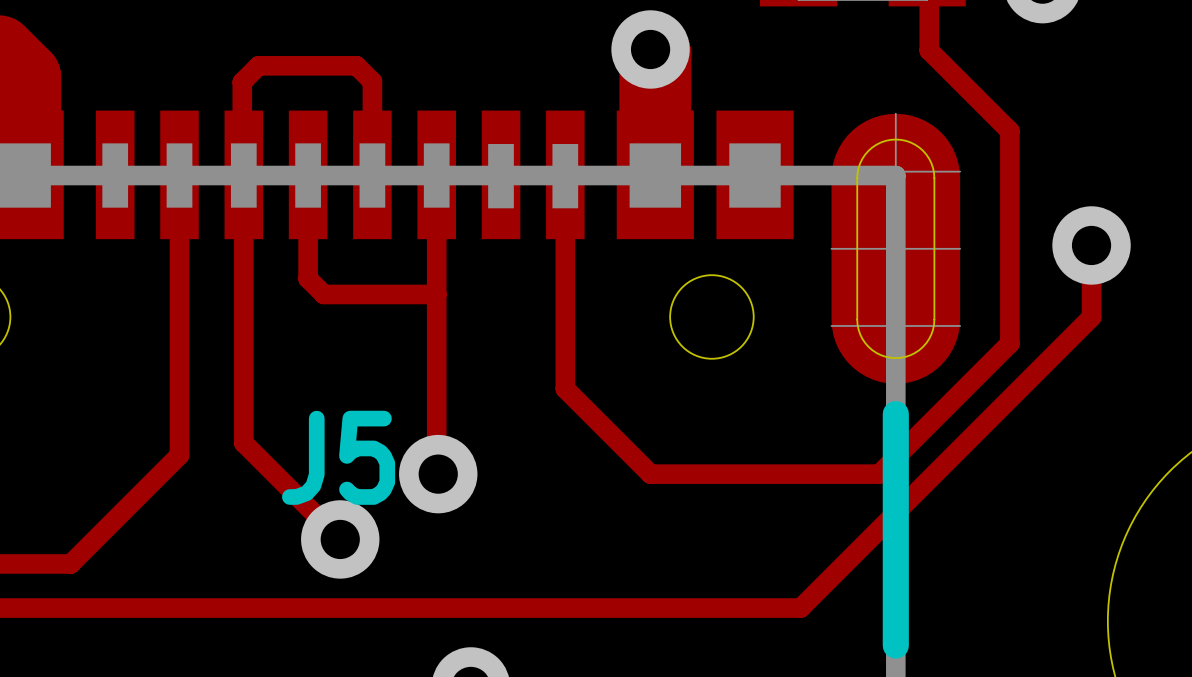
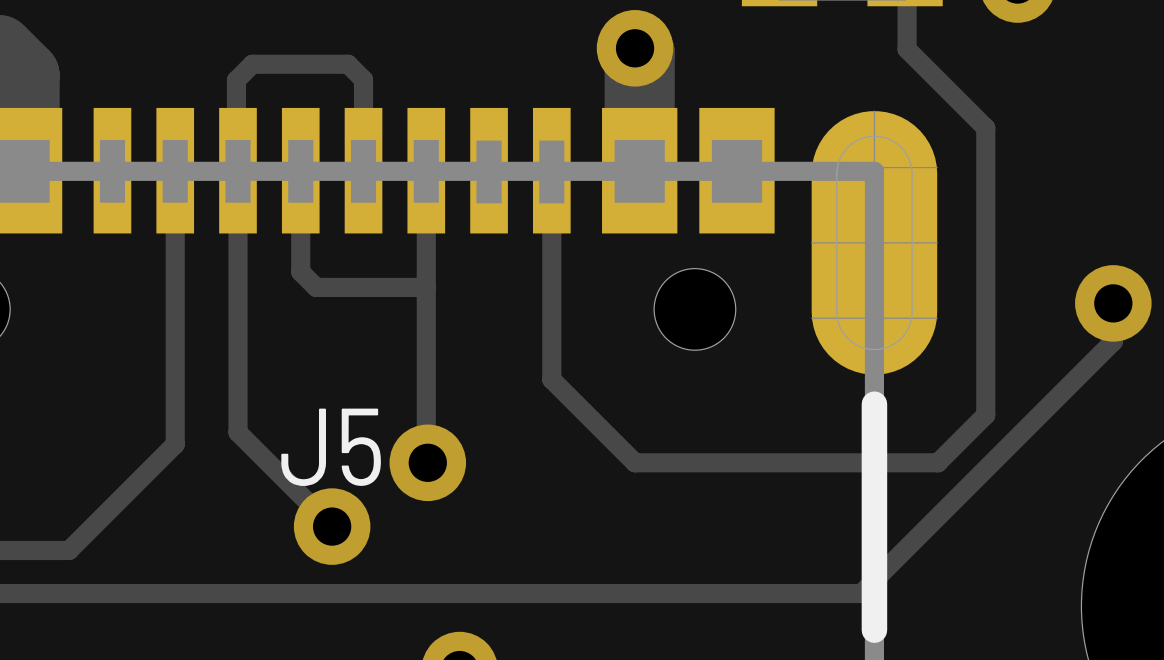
track: (1091, 245) (1091, 317) (800, 608) -> (1113, 303) (1113, 341) (861, 593) (781, 593)
via position: (1091, 245) -> (1113, 303)
track: (1009, 343) (879, 474) -> (985, 335) (985, 414) (937, 462) (858, 462)

